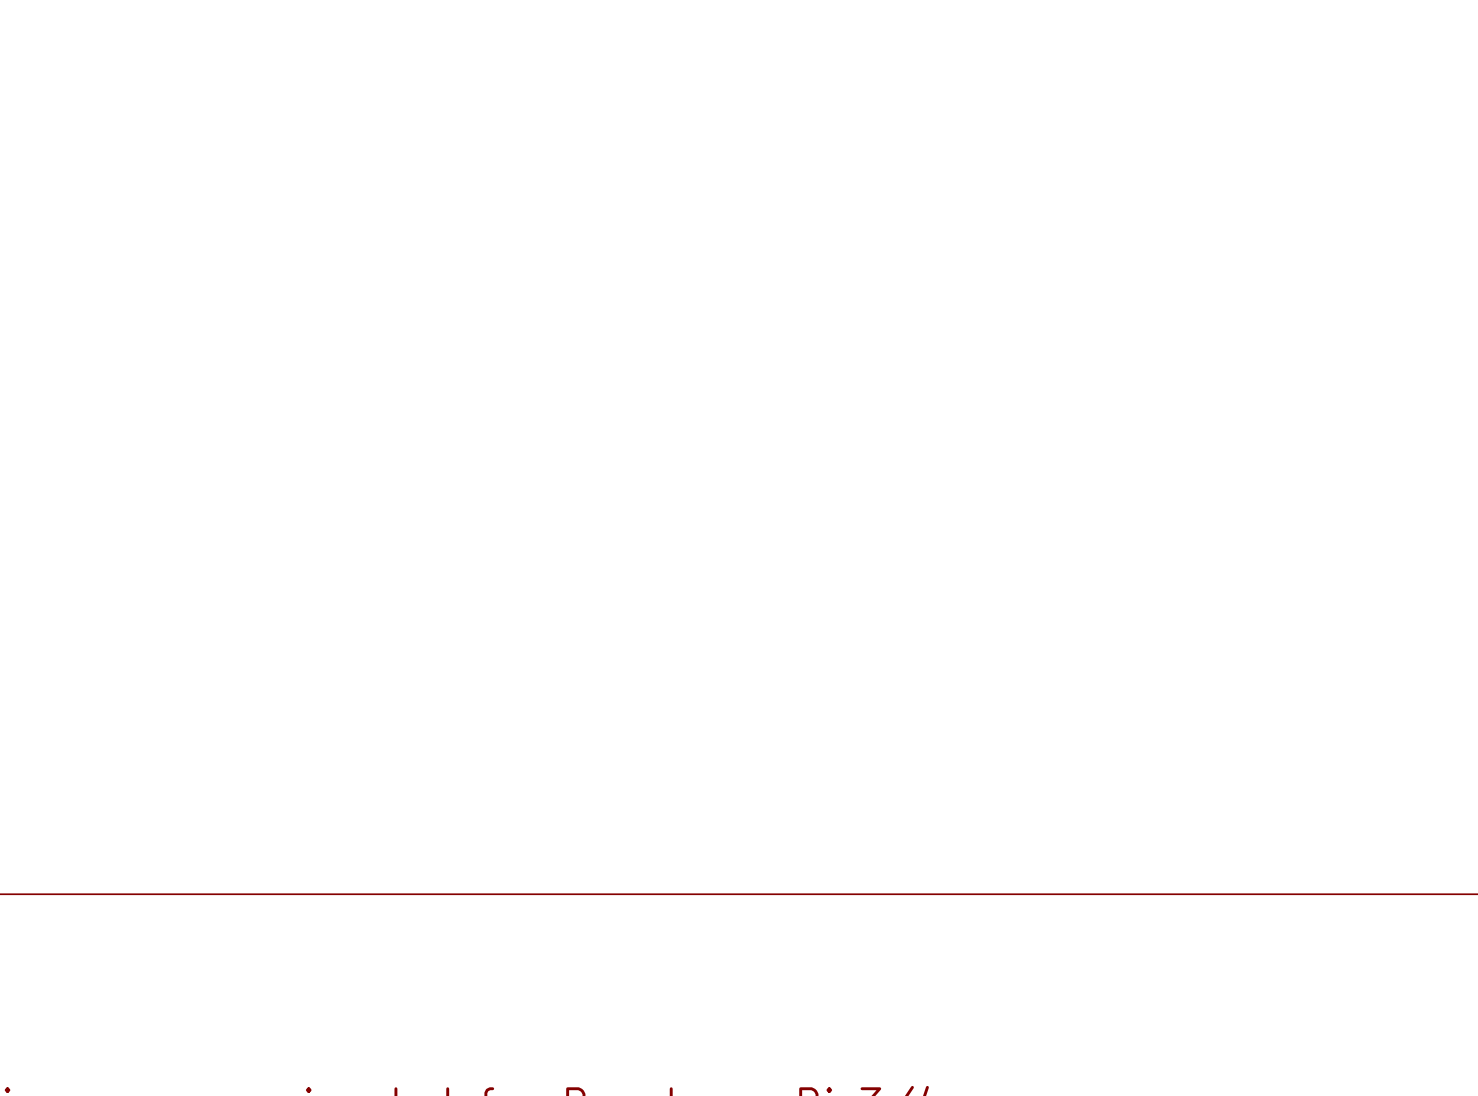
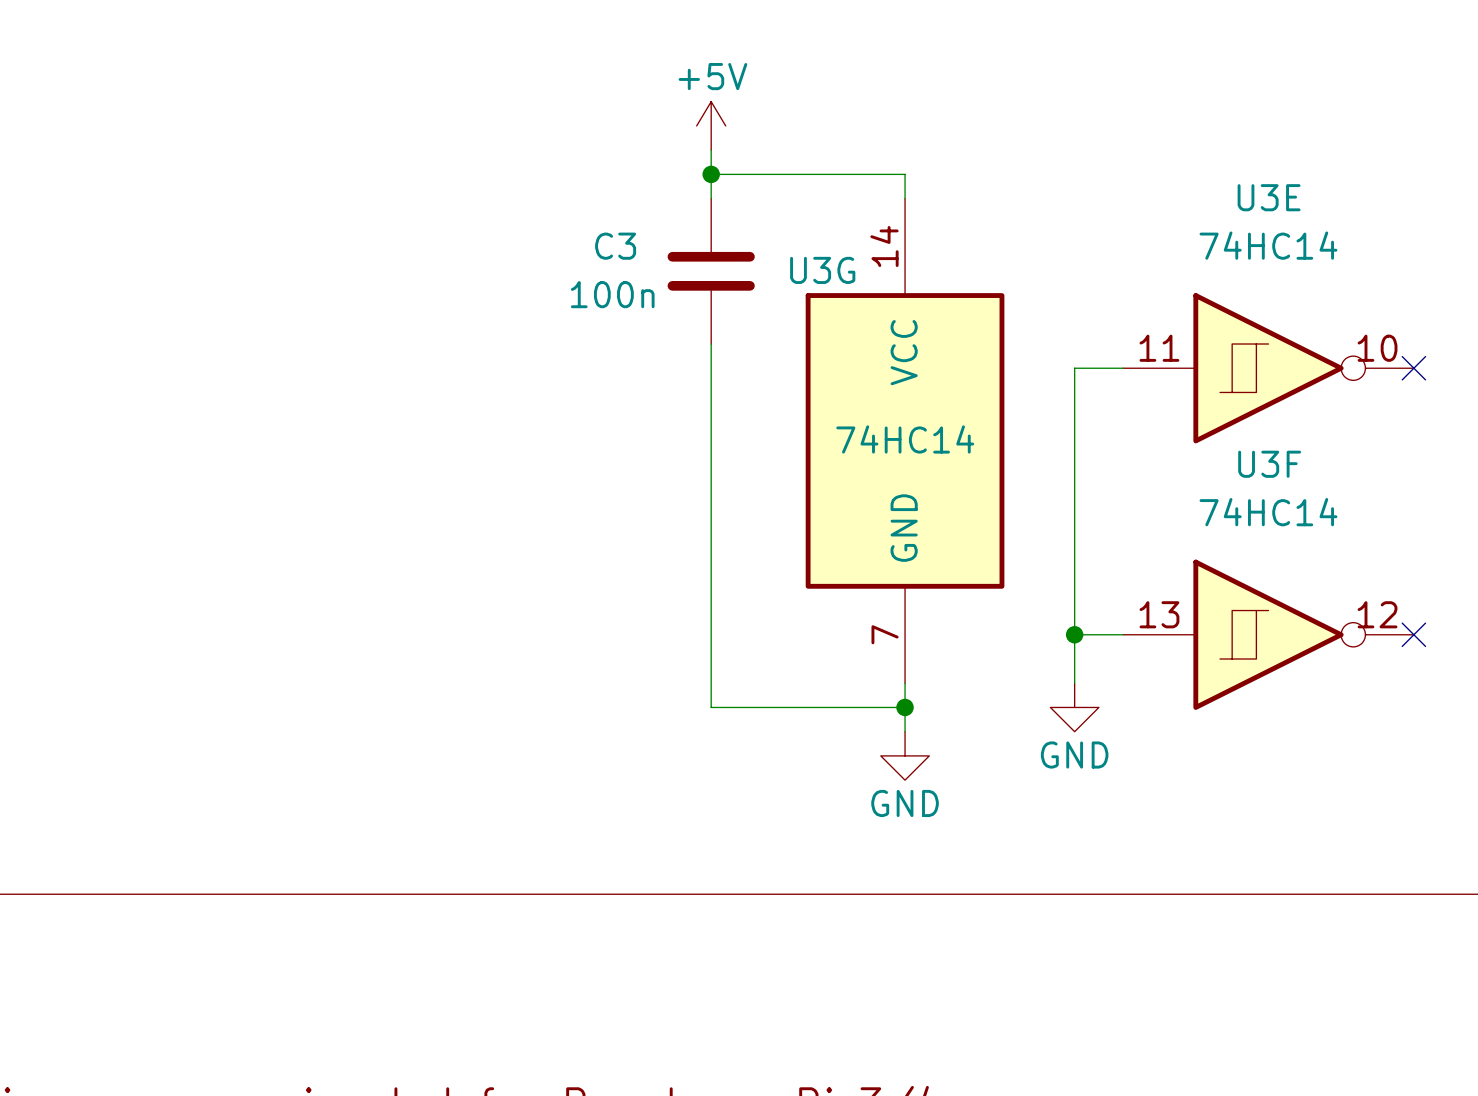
power symbol: none -> +5V (711, 125)
wire: none -> (711, 150) (711, 198)
wire: none -> (711, 174) (905, 174) (905, 198)
junction: none -> (711, 174)
C3: none -> 100n (711, 271)
wire: none -> (711, 344) (711, 707) (905, 707)
wire: none -> (1123, 368) (1074, 368) (1074, 683)
U3E: none -> 74HC14 (1268, 368)
no-connect mark: none -> (1413, 368)
U3G: none -> 74HC14 (905, 440)
wire: none -> (1074, 634) (1123, 634)
junction: none -> (1074, 634)
U3F: none -> 74HC14 (1268, 634)
no-connect mark: none -> (1413, 634)
wire: none -> (905, 683) (905, 731)
junction: none -> (905, 707)
power symbol: none -> GND (1074, 707)
power symbol: none -> GND (905, 755)

